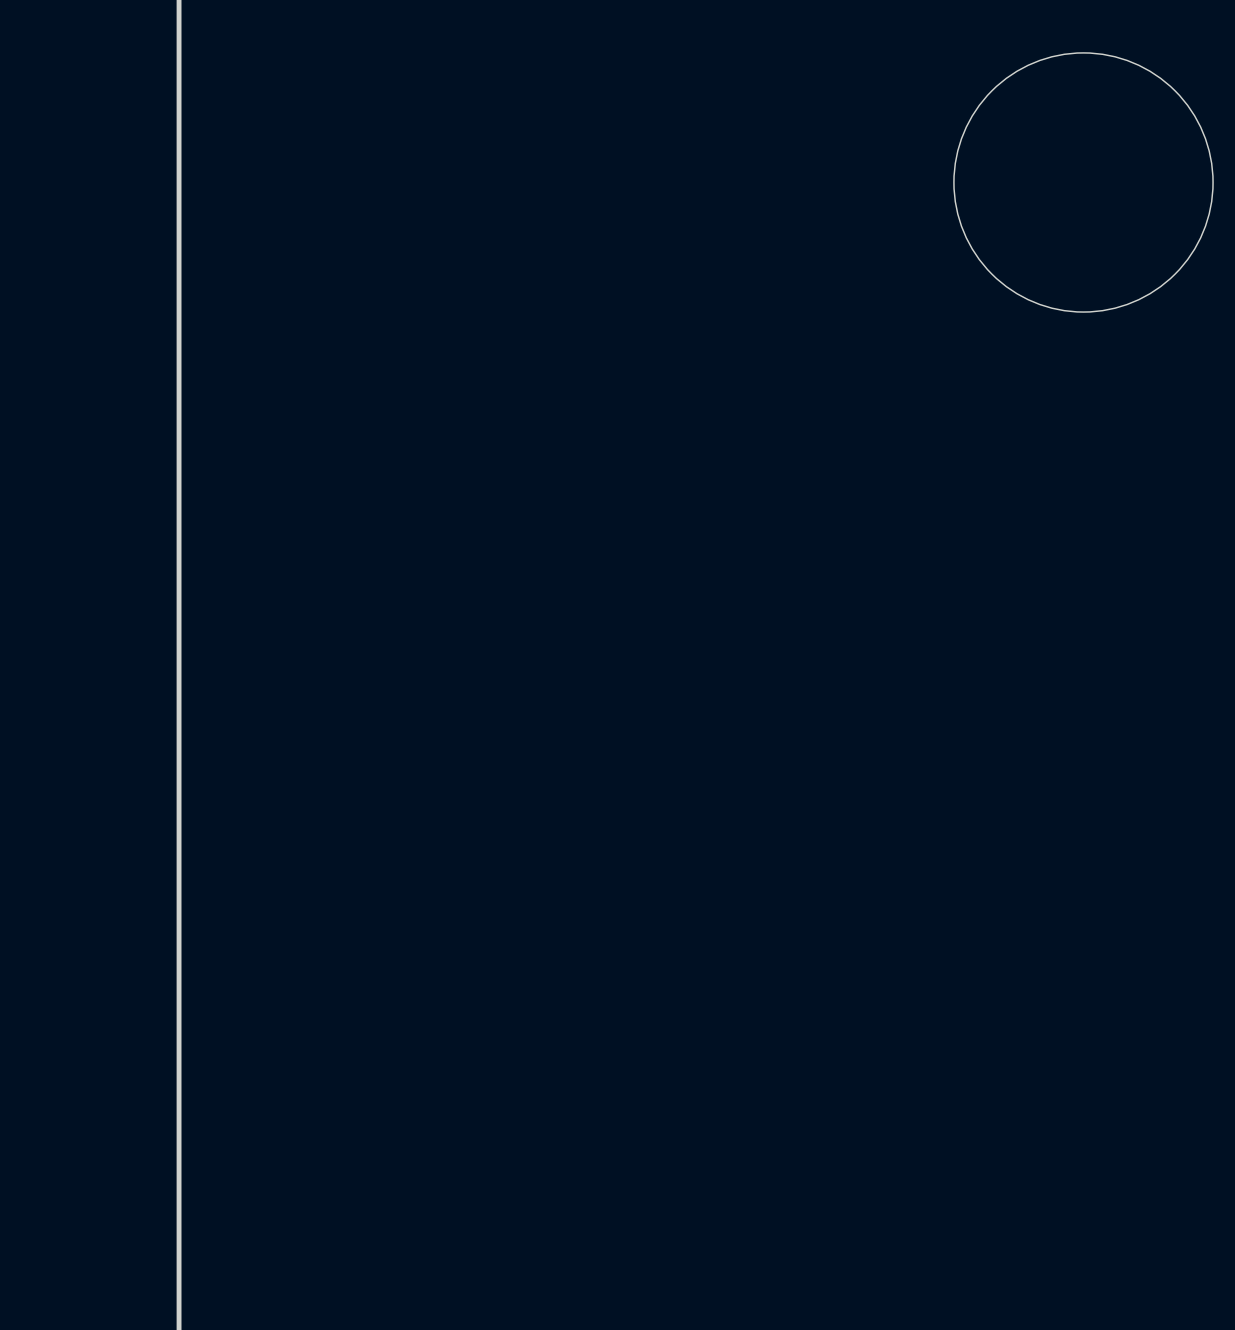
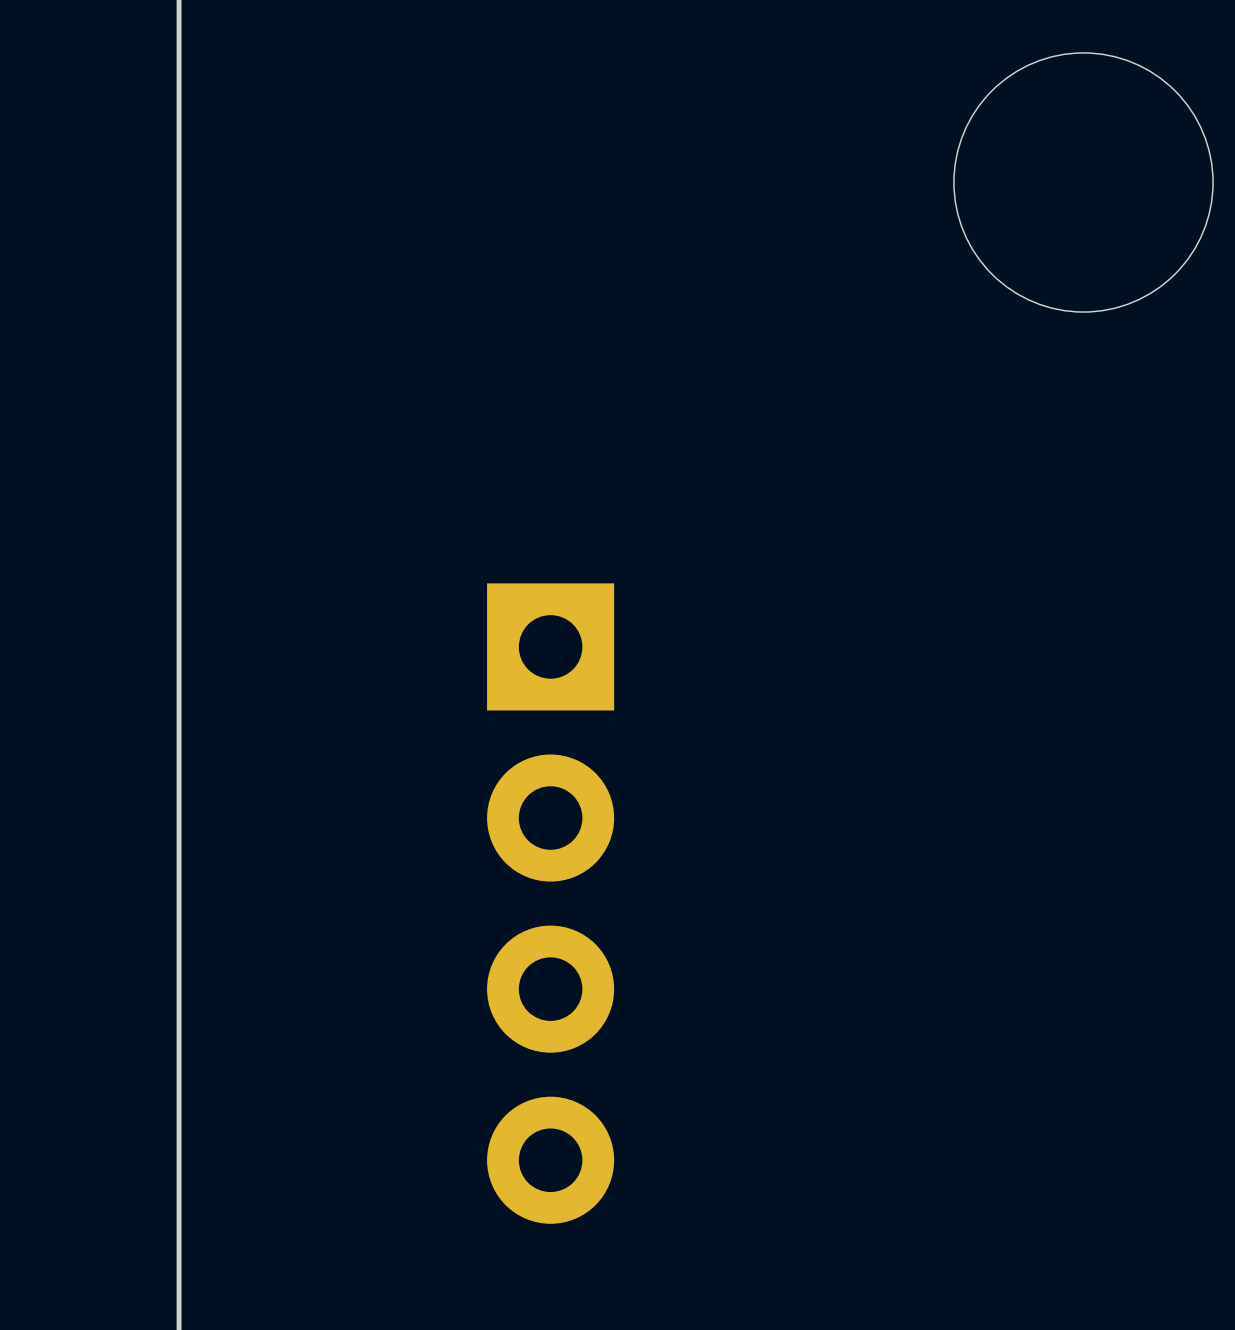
part: none -> (550, 903)

